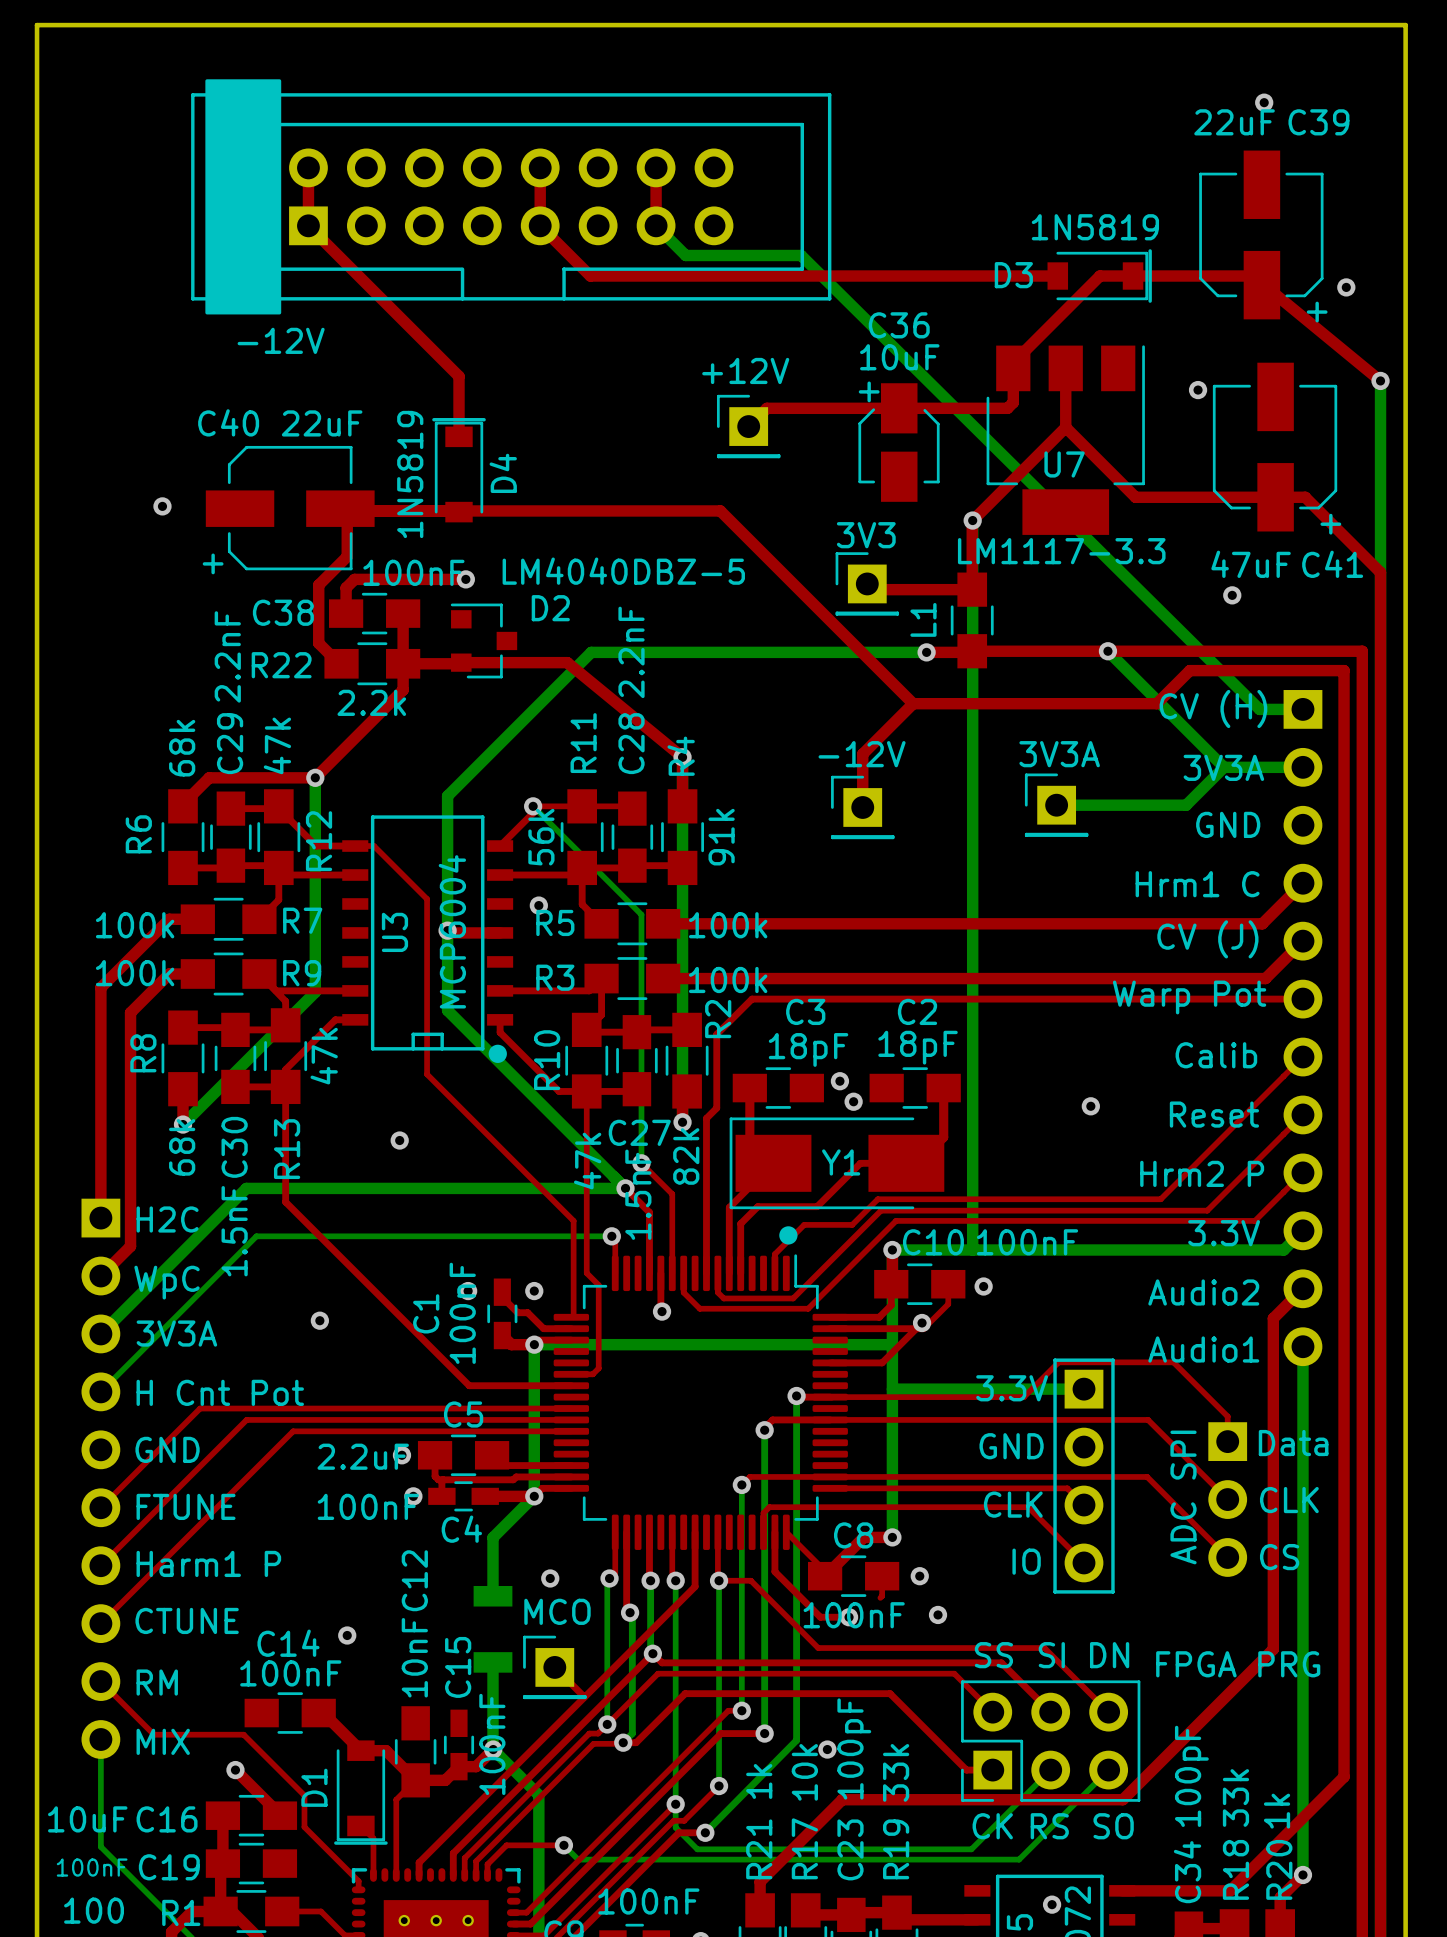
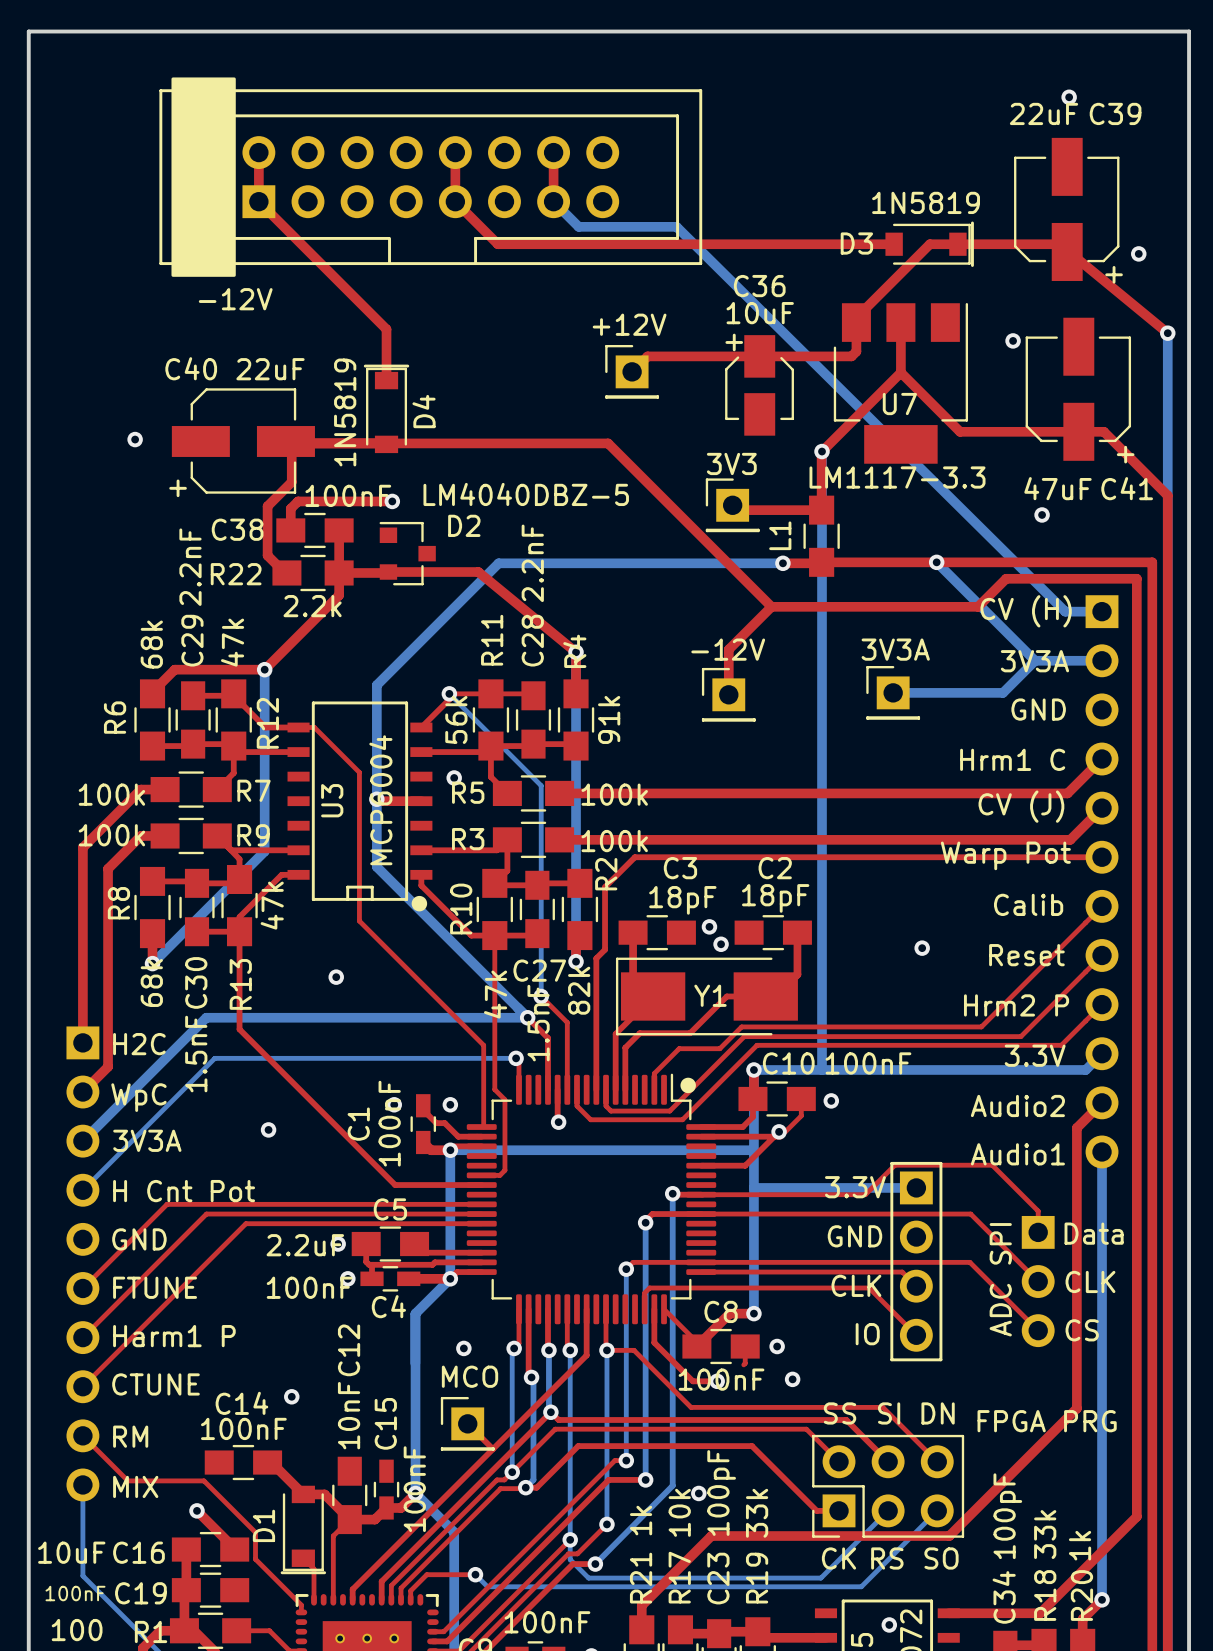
drawing position: (788, 1235) -> (688, 1085)
part: (492, 1629) -> none
bottom track: (492, 1662) (492, 1749) -> (415, 1313) (415, 1493)

